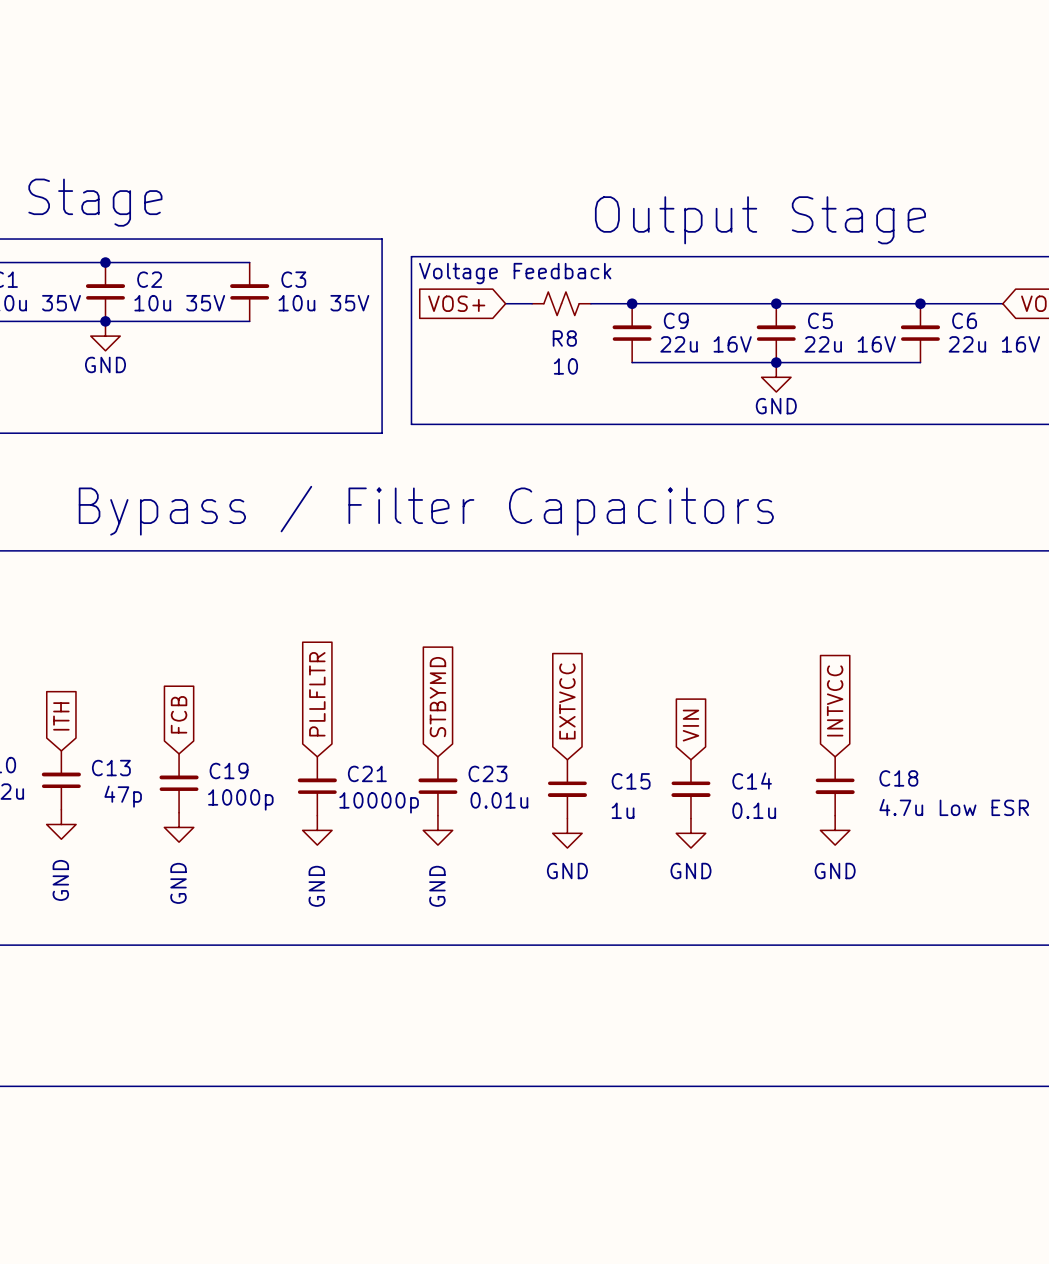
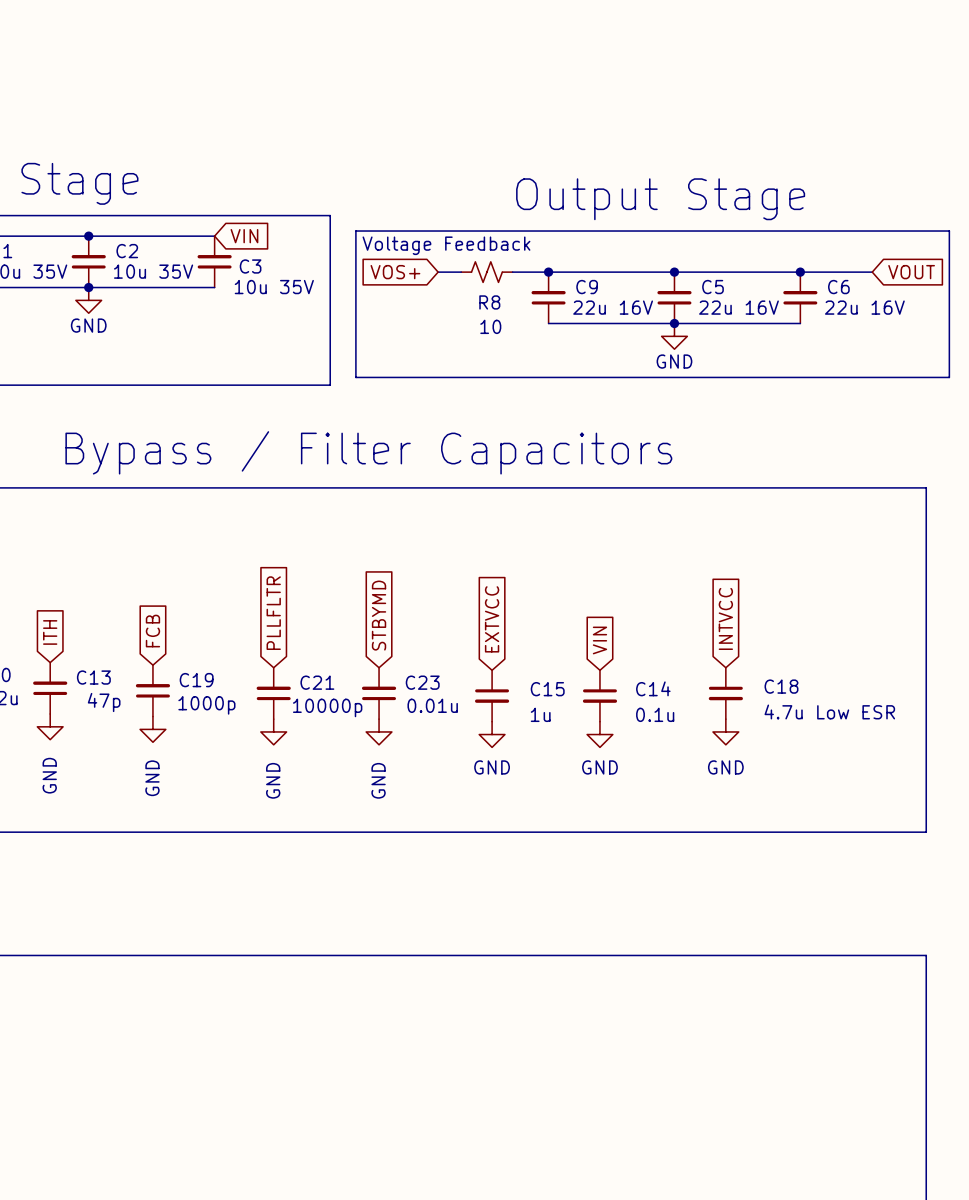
global label: none -> VIN (244, 236)
C3 name position: C3 (293, 279) -> C3 (250, 266)
C3 value position: 10u 35V (323, 303) -> 10u 35V (274, 287)

